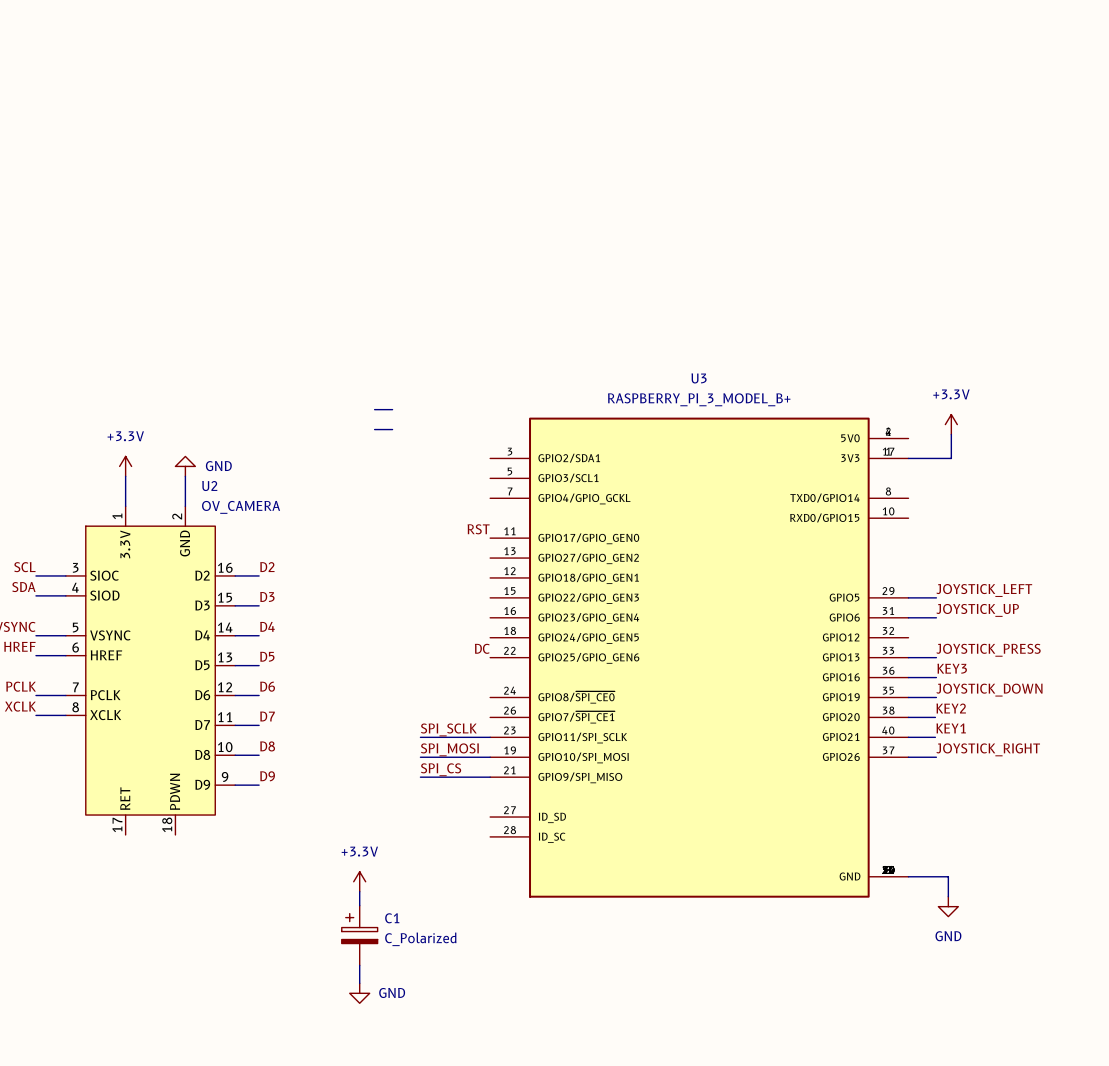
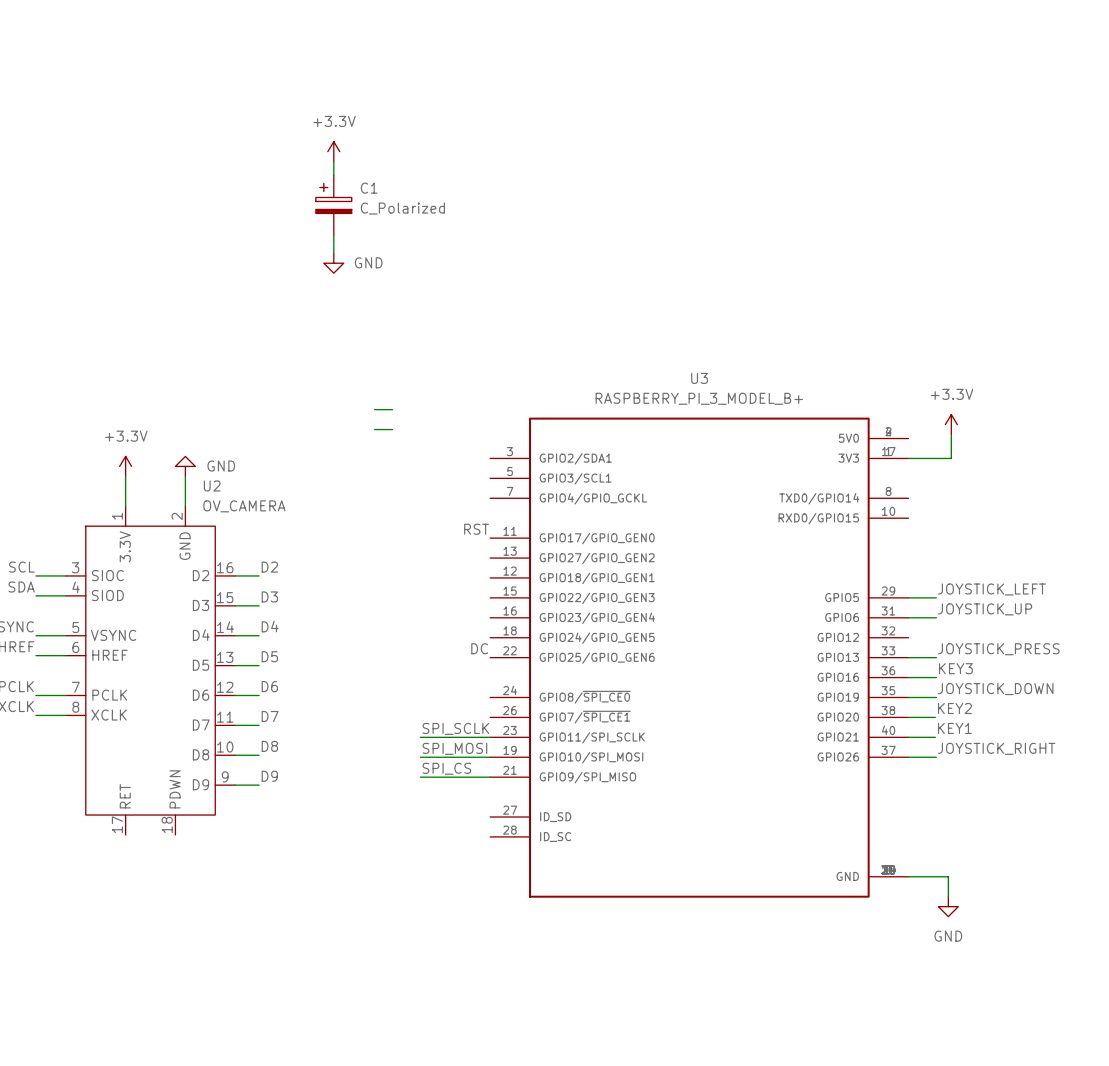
power symbol: none -> +3.3V (333, 151)
wire: none -> (333, 161) (333, 175)
wire: none -> (333, 235) (333, 253)
power symbol: none -> GND (333, 263)
power symbol: +3.3V (359, 881) -> none
wire: (359, 891) (359, 905) -> none
C1 position: (359, 935) -> (333, 205)
wire: (359, 965) (359, 983) -> none
power symbol: GND (359, 993) -> none

